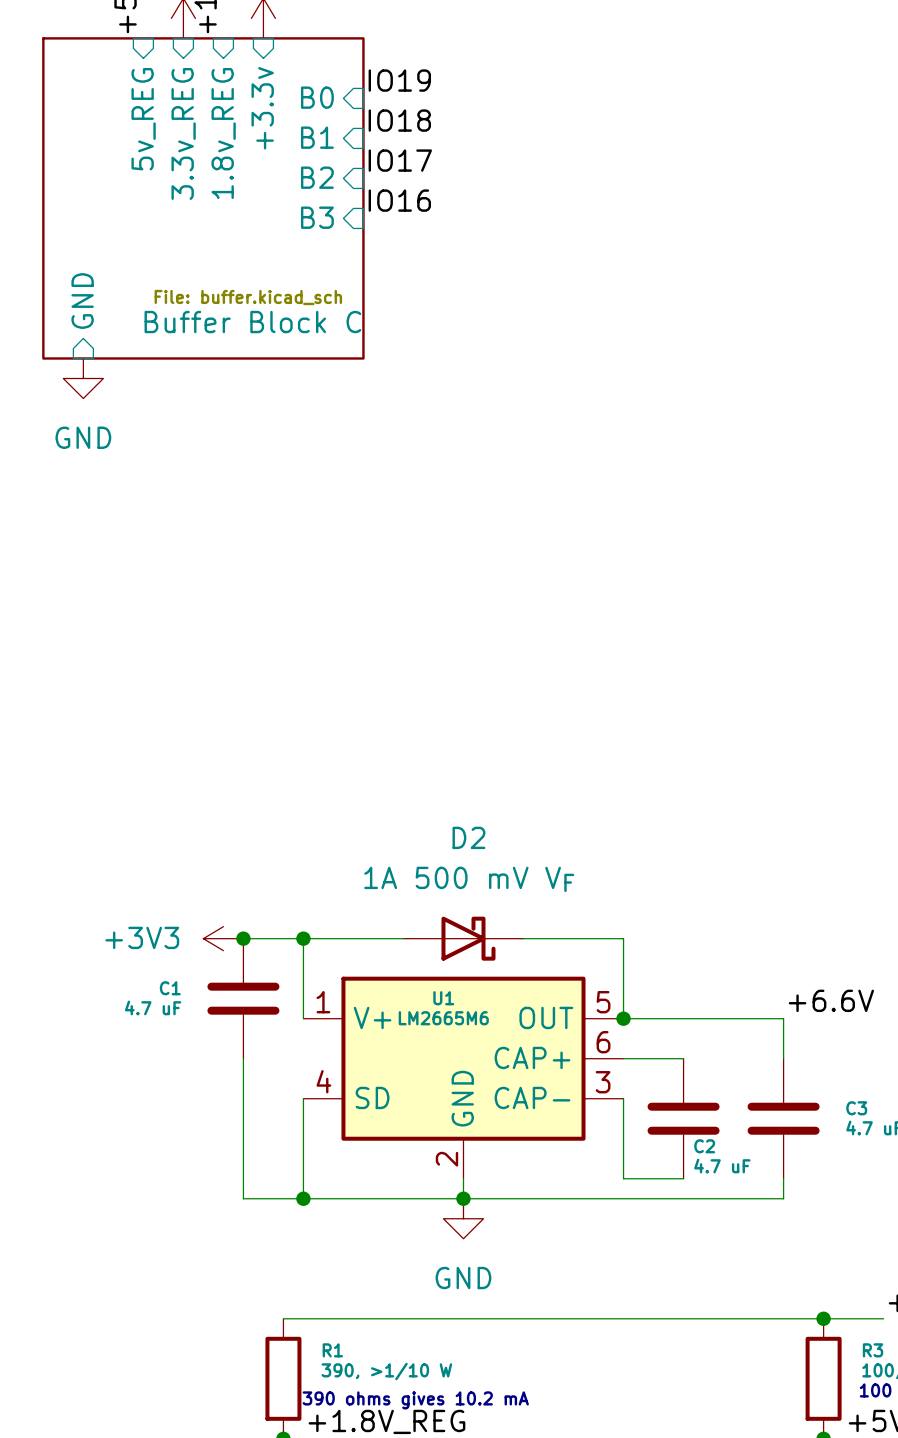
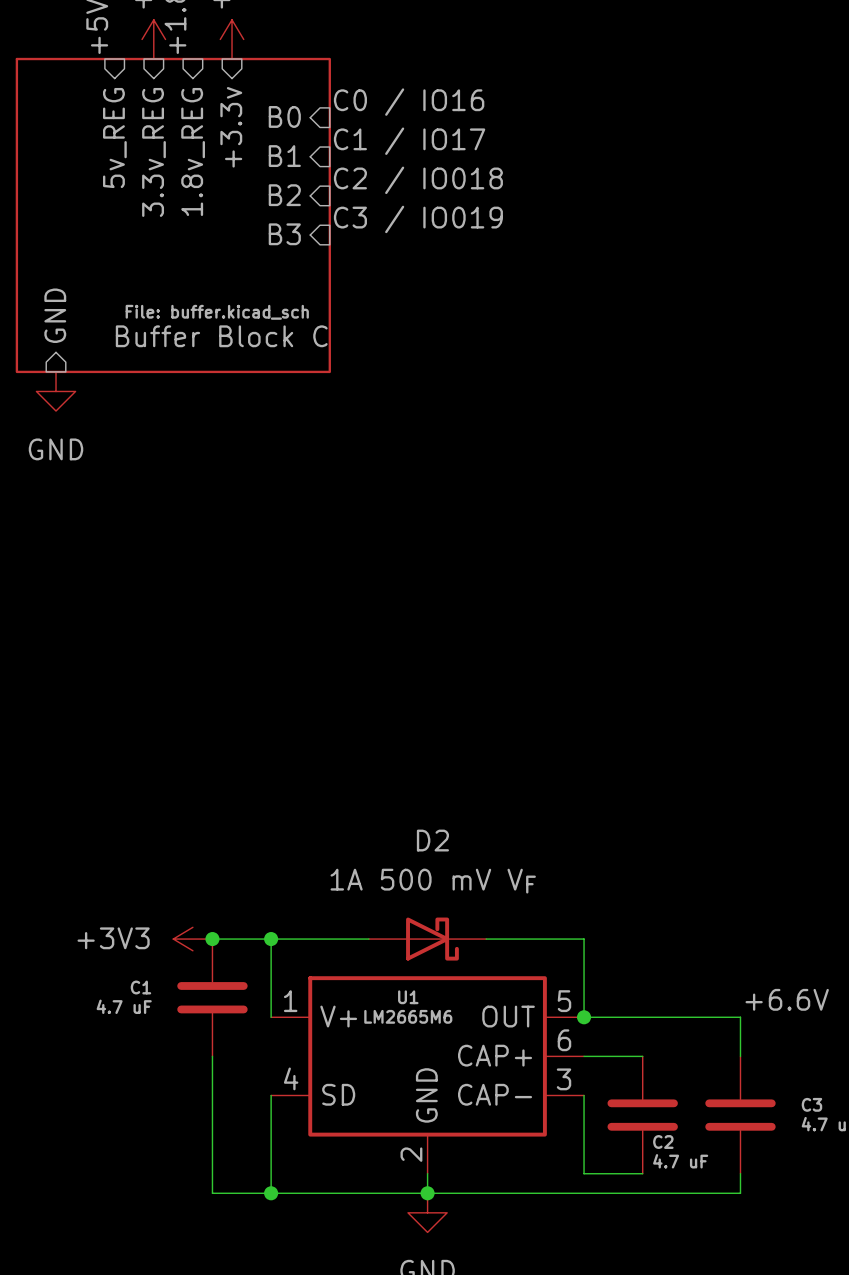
label: IO19 (399, 80) -> C0 / IO16 (409, 102)
label: IO18 (399, 120) -> C1 / IO17 (409, 141)
label: IO17 (400, 160) -> C2 / IO018 (418, 180)
label: IO16 (399, 200) -> C3 / IO019 (418, 219)

